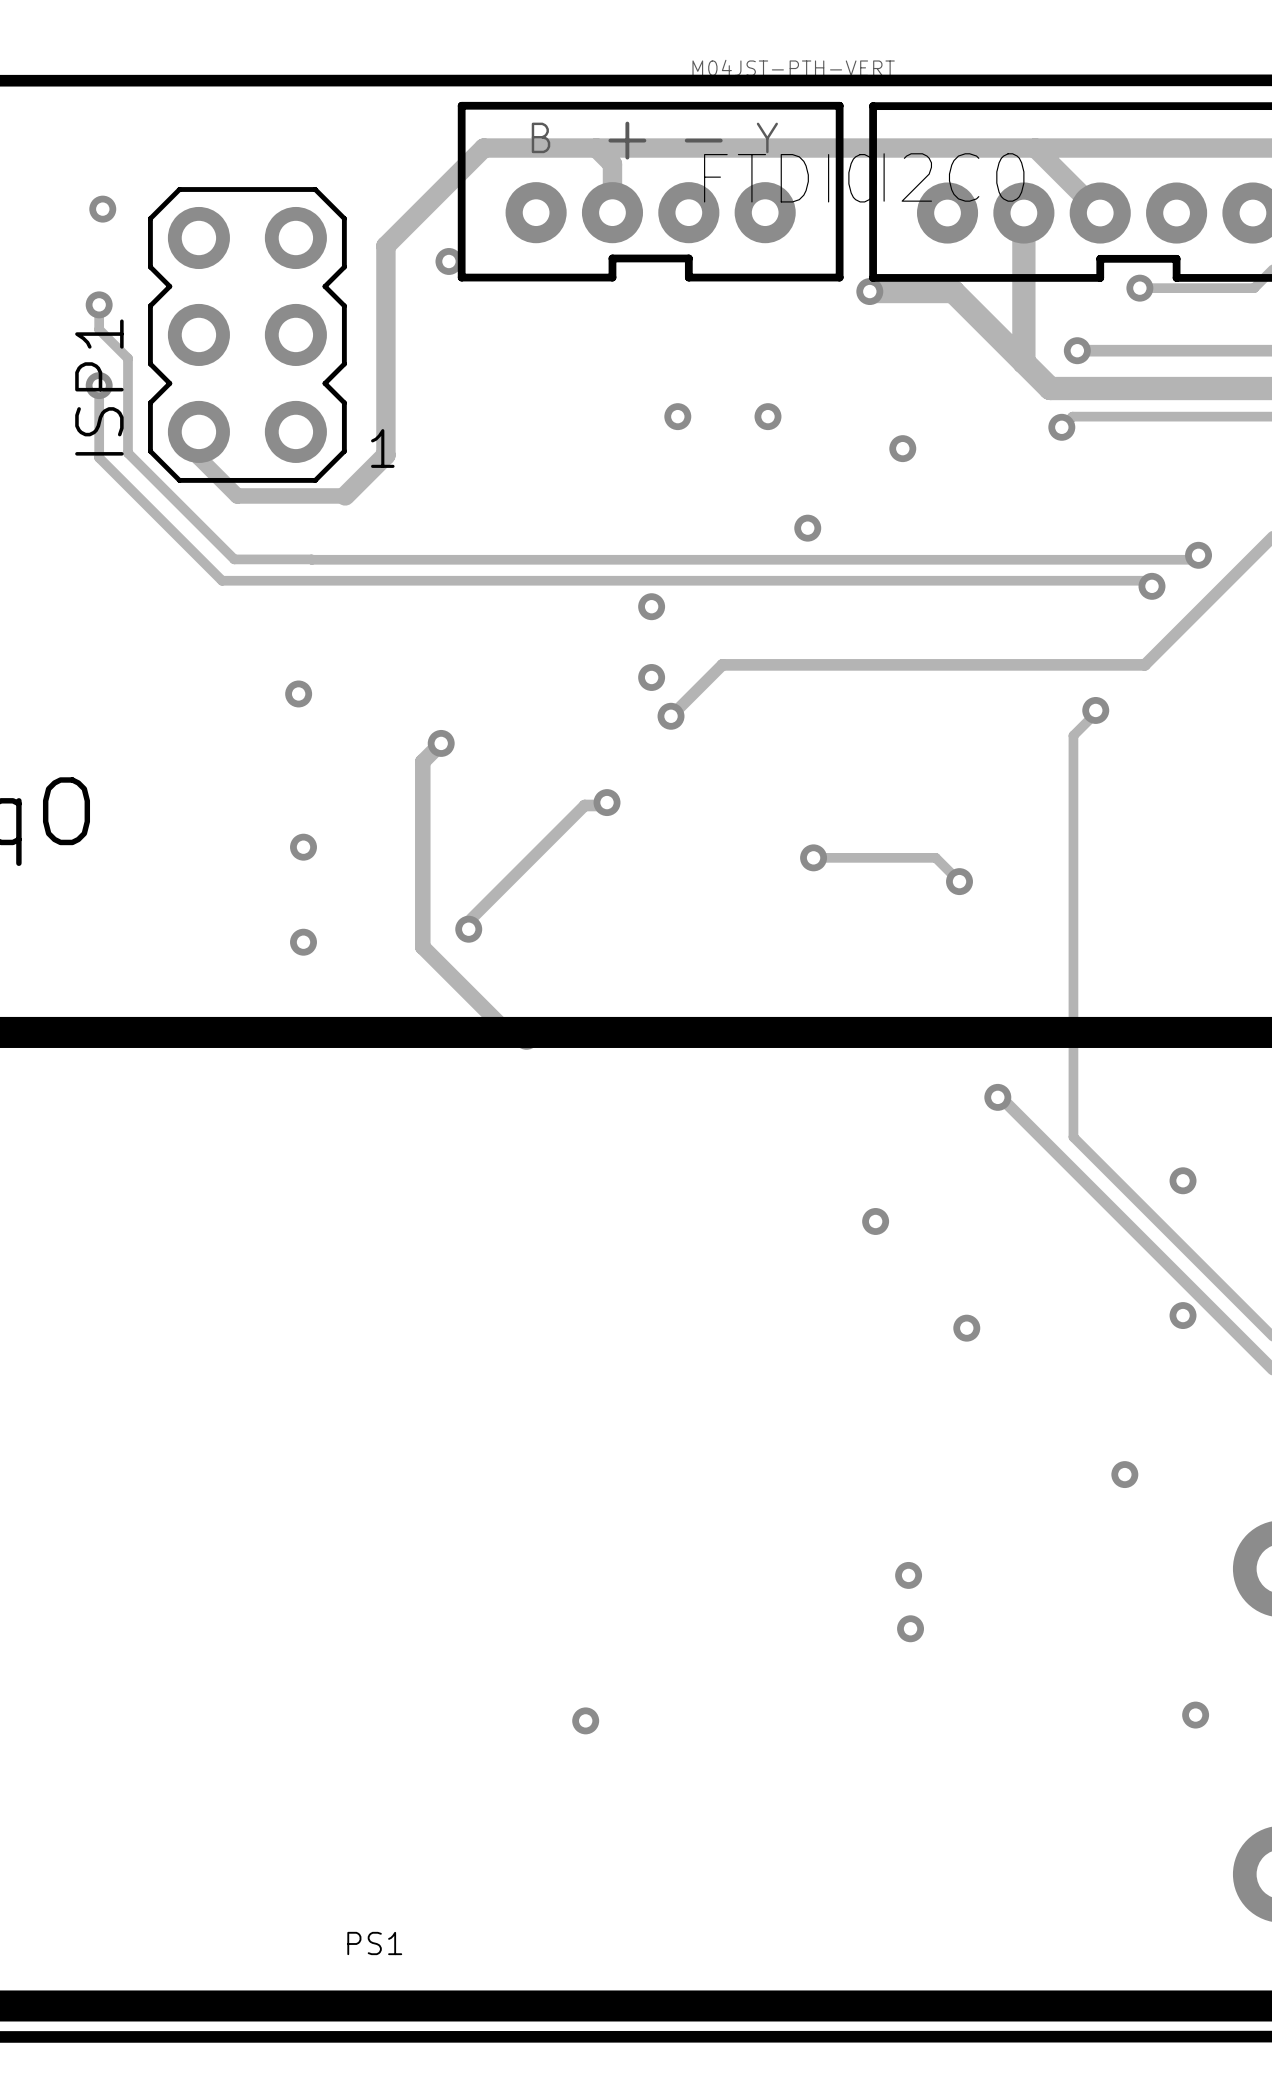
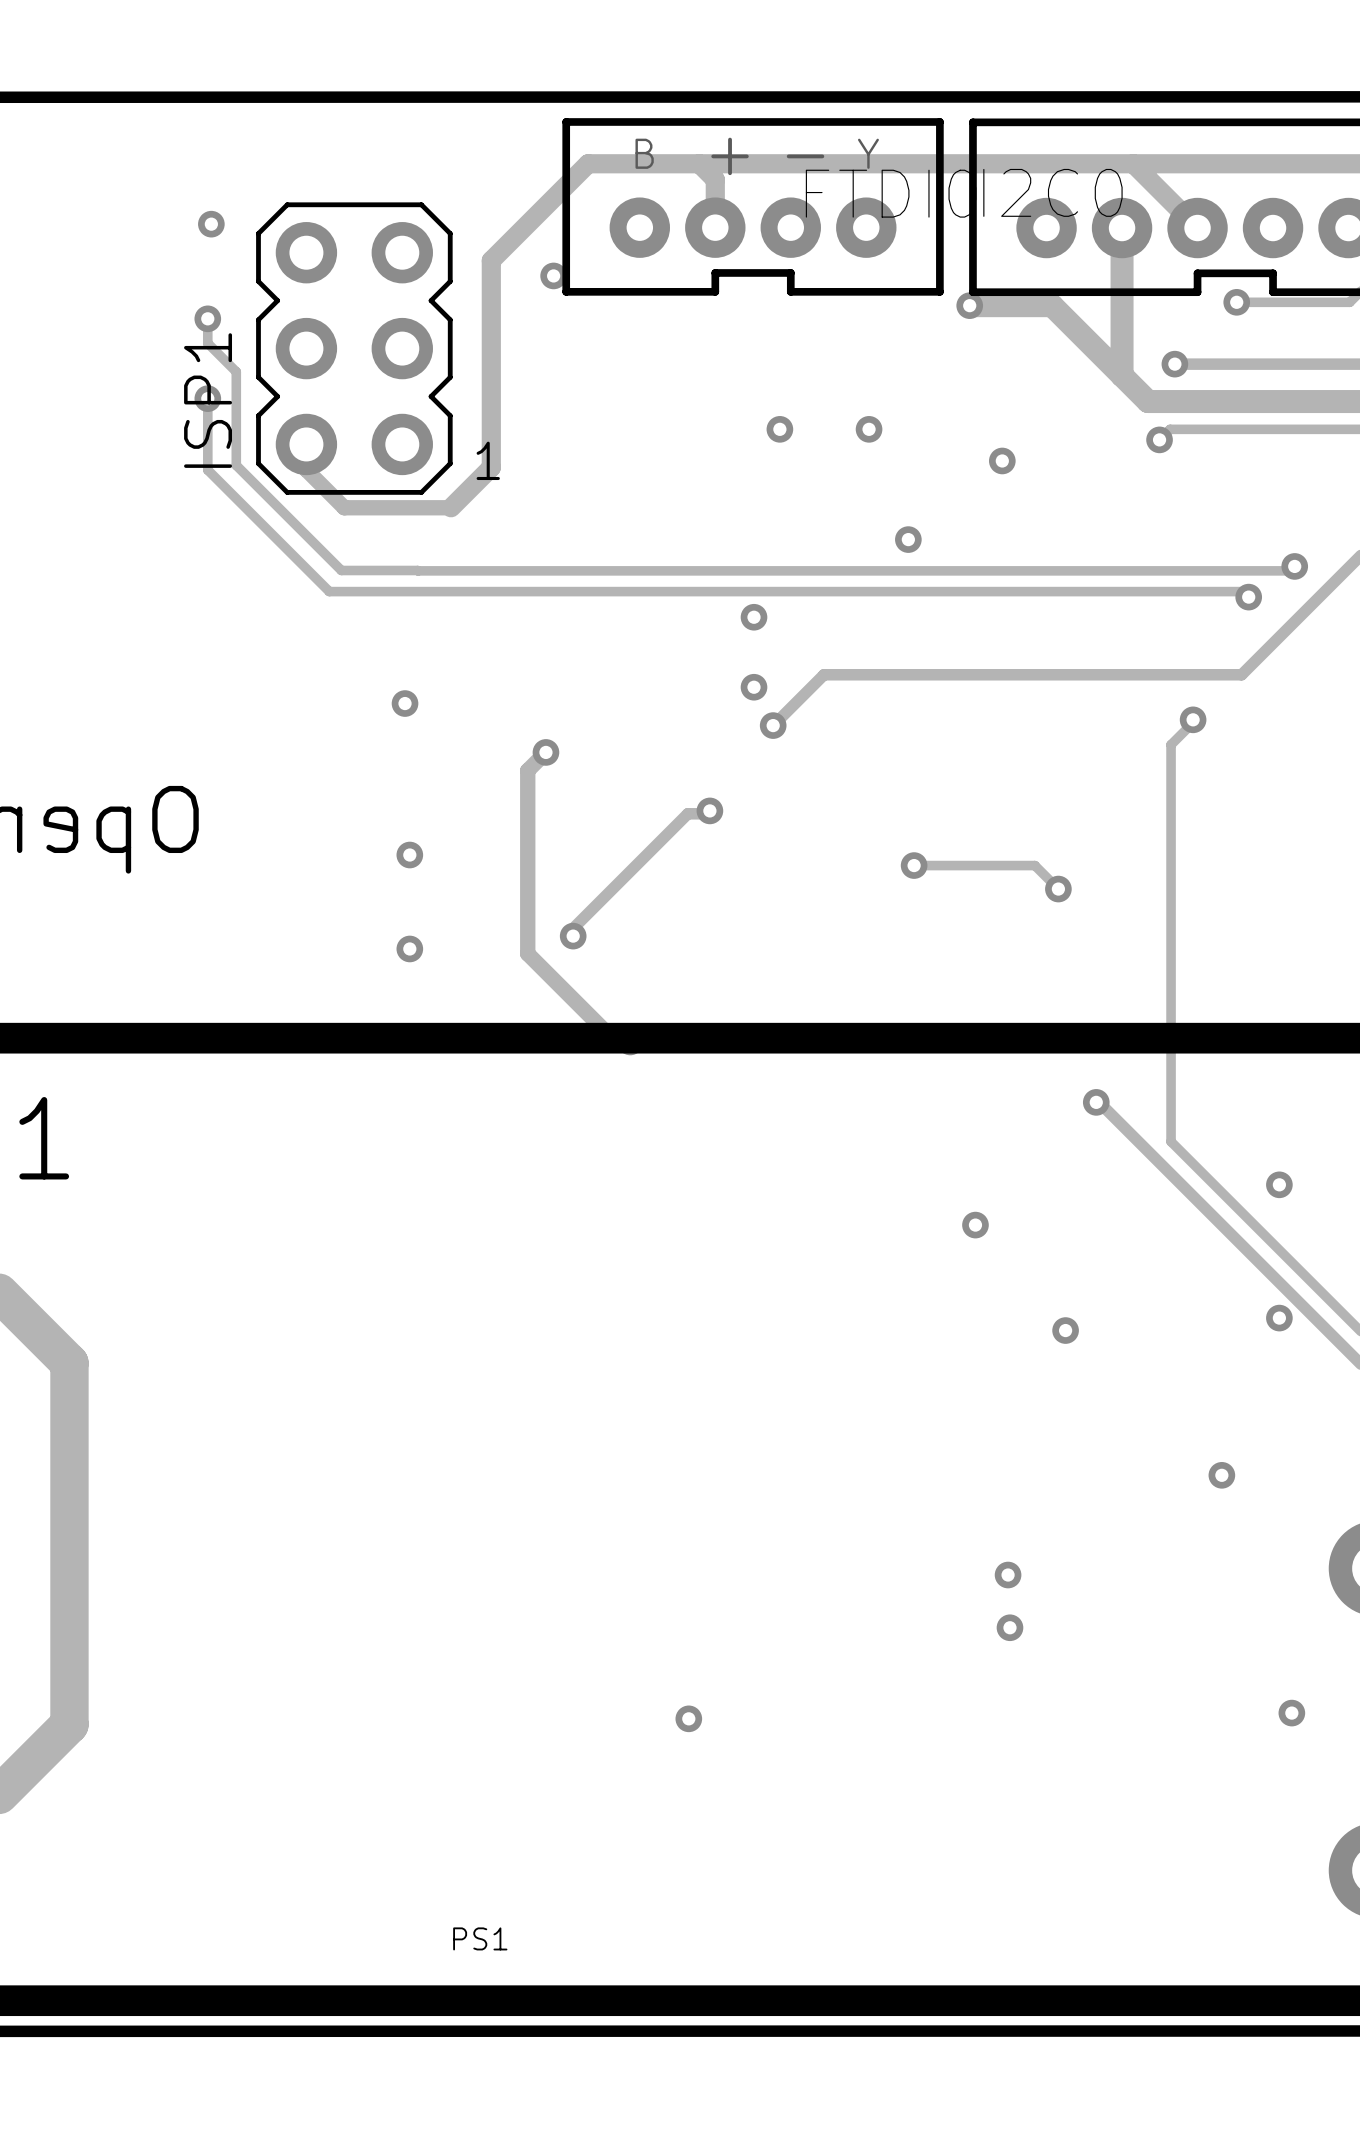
I2C0 value: M04JST-PTH-VERT (793, 67) -> none

